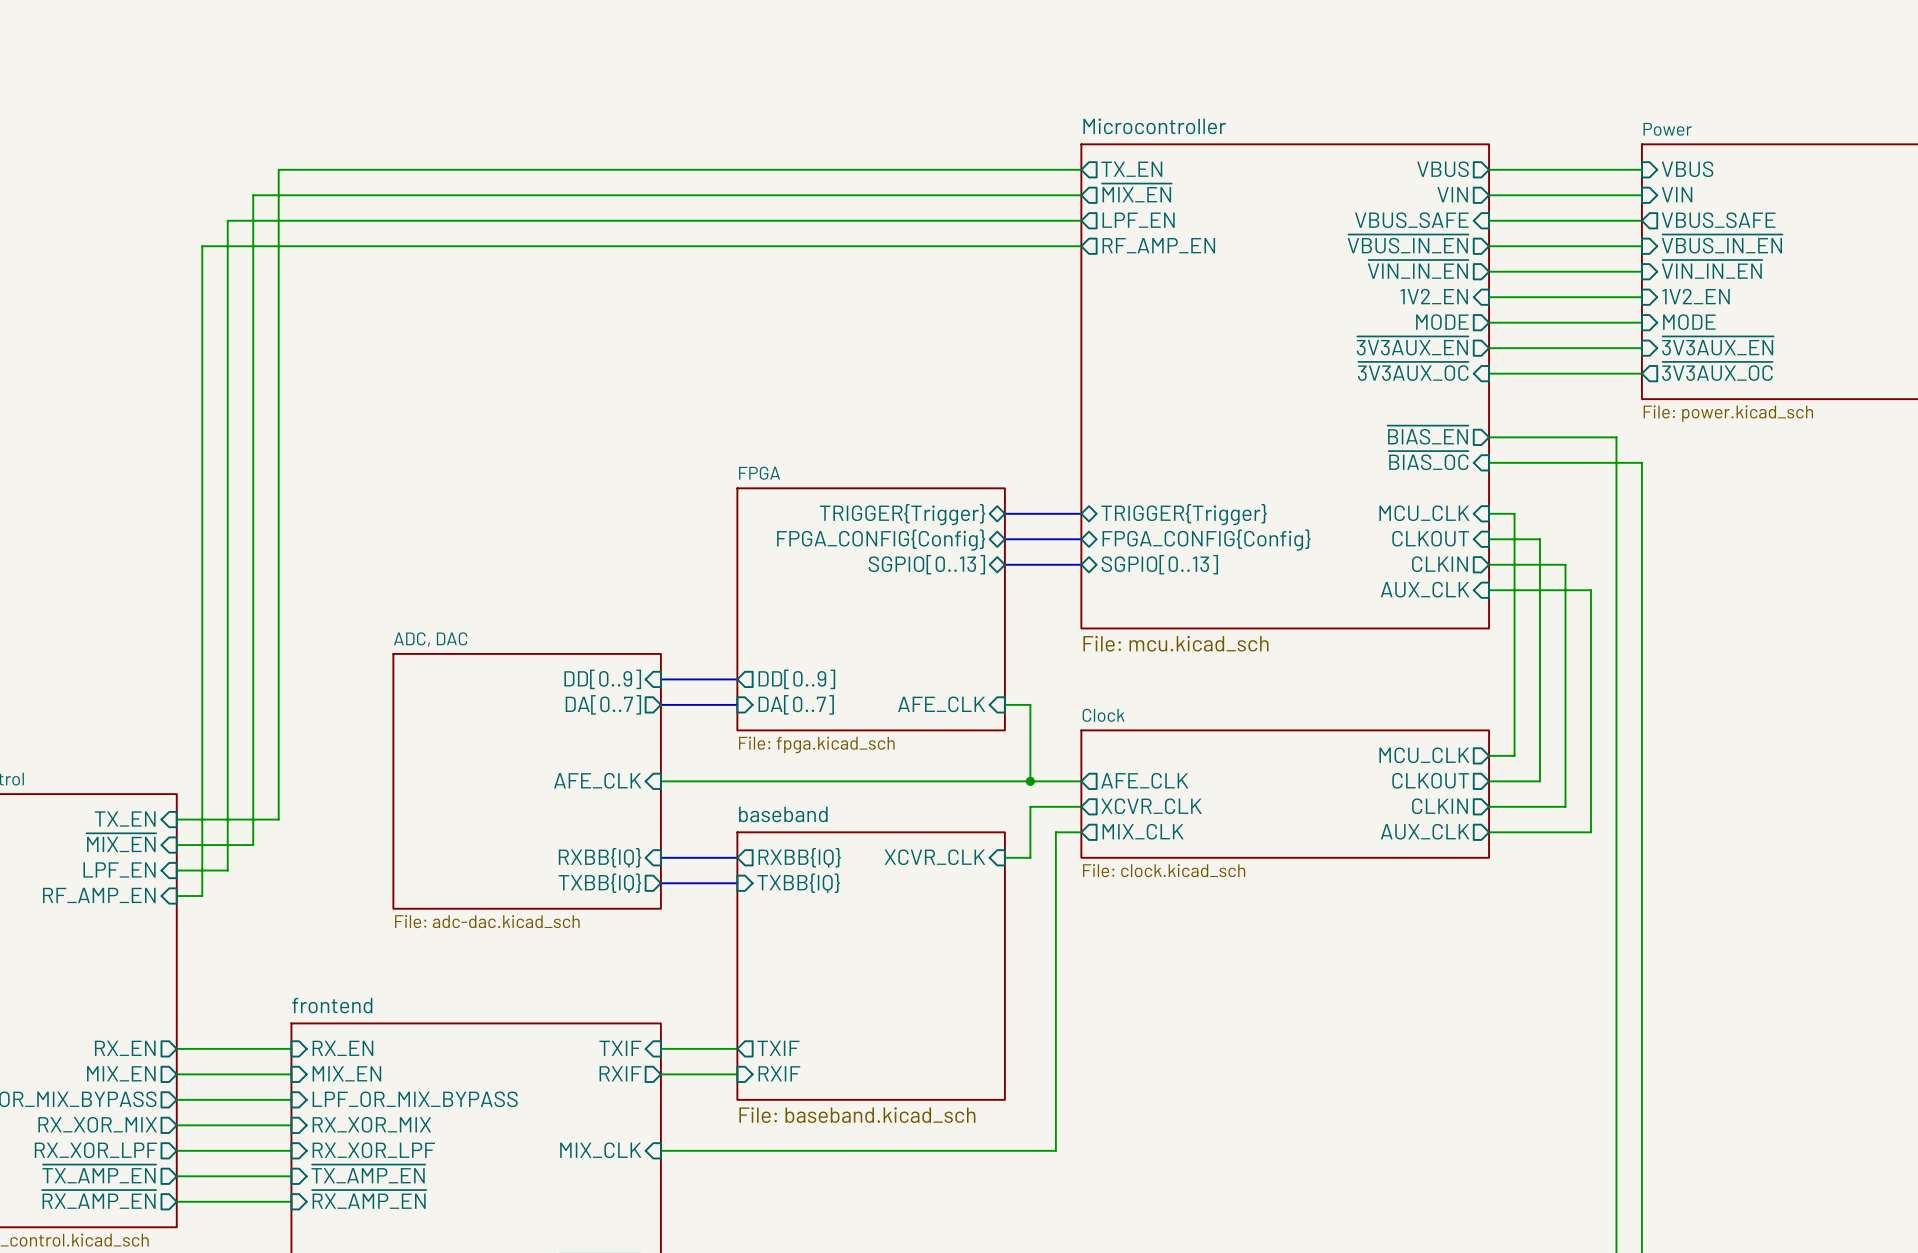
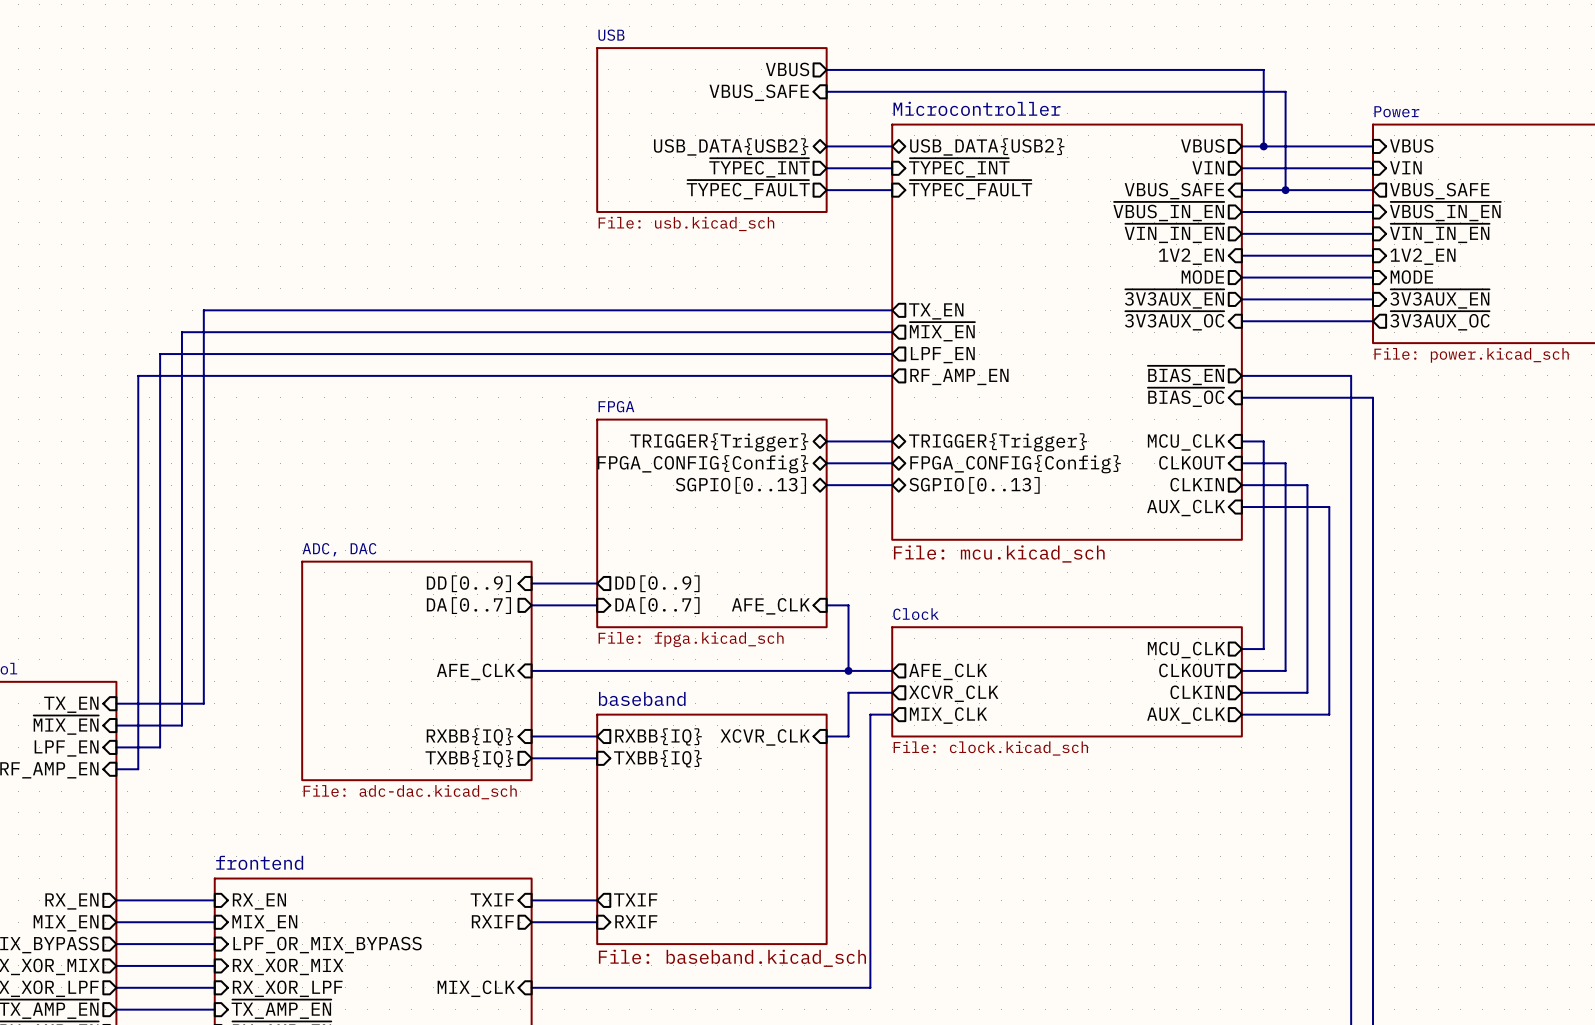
sheet pin: none -> VBUS (787, 69)
wire: none -> (826, 69) (1263, 69) (1263, 146)
sheet pin: none -> VBUS_SAFE (759, 92)
wire: none -> (826, 91) (1285, 91) (1285, 190)
sheet USB: none -> File: usb.kicad_sch (711, 130)
sheet pin: none -> USB_DATA{USB2} (731, 146)
bus: none -> (826, 146) (892, 146)
wire: (1081, 169) (278, 169) (278, 360) -> (892, 310) (203, 310)
sheet pin shape: output (1131, 169) -> bidirectional (987, 146)
sheet pin: TX_EN (1131, 169) -> USB_DATA{USB2} (987, 146)
junction: none -> (1263, 146)
sheet pin shape: output (1136, 192) -> input (959, 167)
sheet pin: ~{MIX_EN} (1136, 192) -> ~{TYPEC_INT} (959, 167)
sheet pin: none -> ~{TYPEC_INT} (759, 167)
wire: (1004, 195) (253, 195) (253, 386) -> (892, 332) (181, 332)
sheet pin: none -> ~{TYPEC_FAULT} (748, 189)
wire: (1004, 220) (227, 220) (227, 411) -> (892, 354) (160, 354)
sheet pin shape: output (1138, 220) -> input (970, 189)
sheet pin: LPF_EN (1138, 220) -> ~{TYPEC_FAULT} (970, 189)
junction: none -> (1285, 190)
sheet pin position: RF_AMP_EN (1158, 245) -> RF_AMP_EN (959, 376)
wire: (1081, 246) (202, 246) (202, 437) -> (892, 375) (138, 375)
sheet pin: none -> TX_EN (936, 311)
sheet pin: none -> ~{MIX_EN} (942, 331)
sheet pin: none -> LPF_EN (942, 355)

